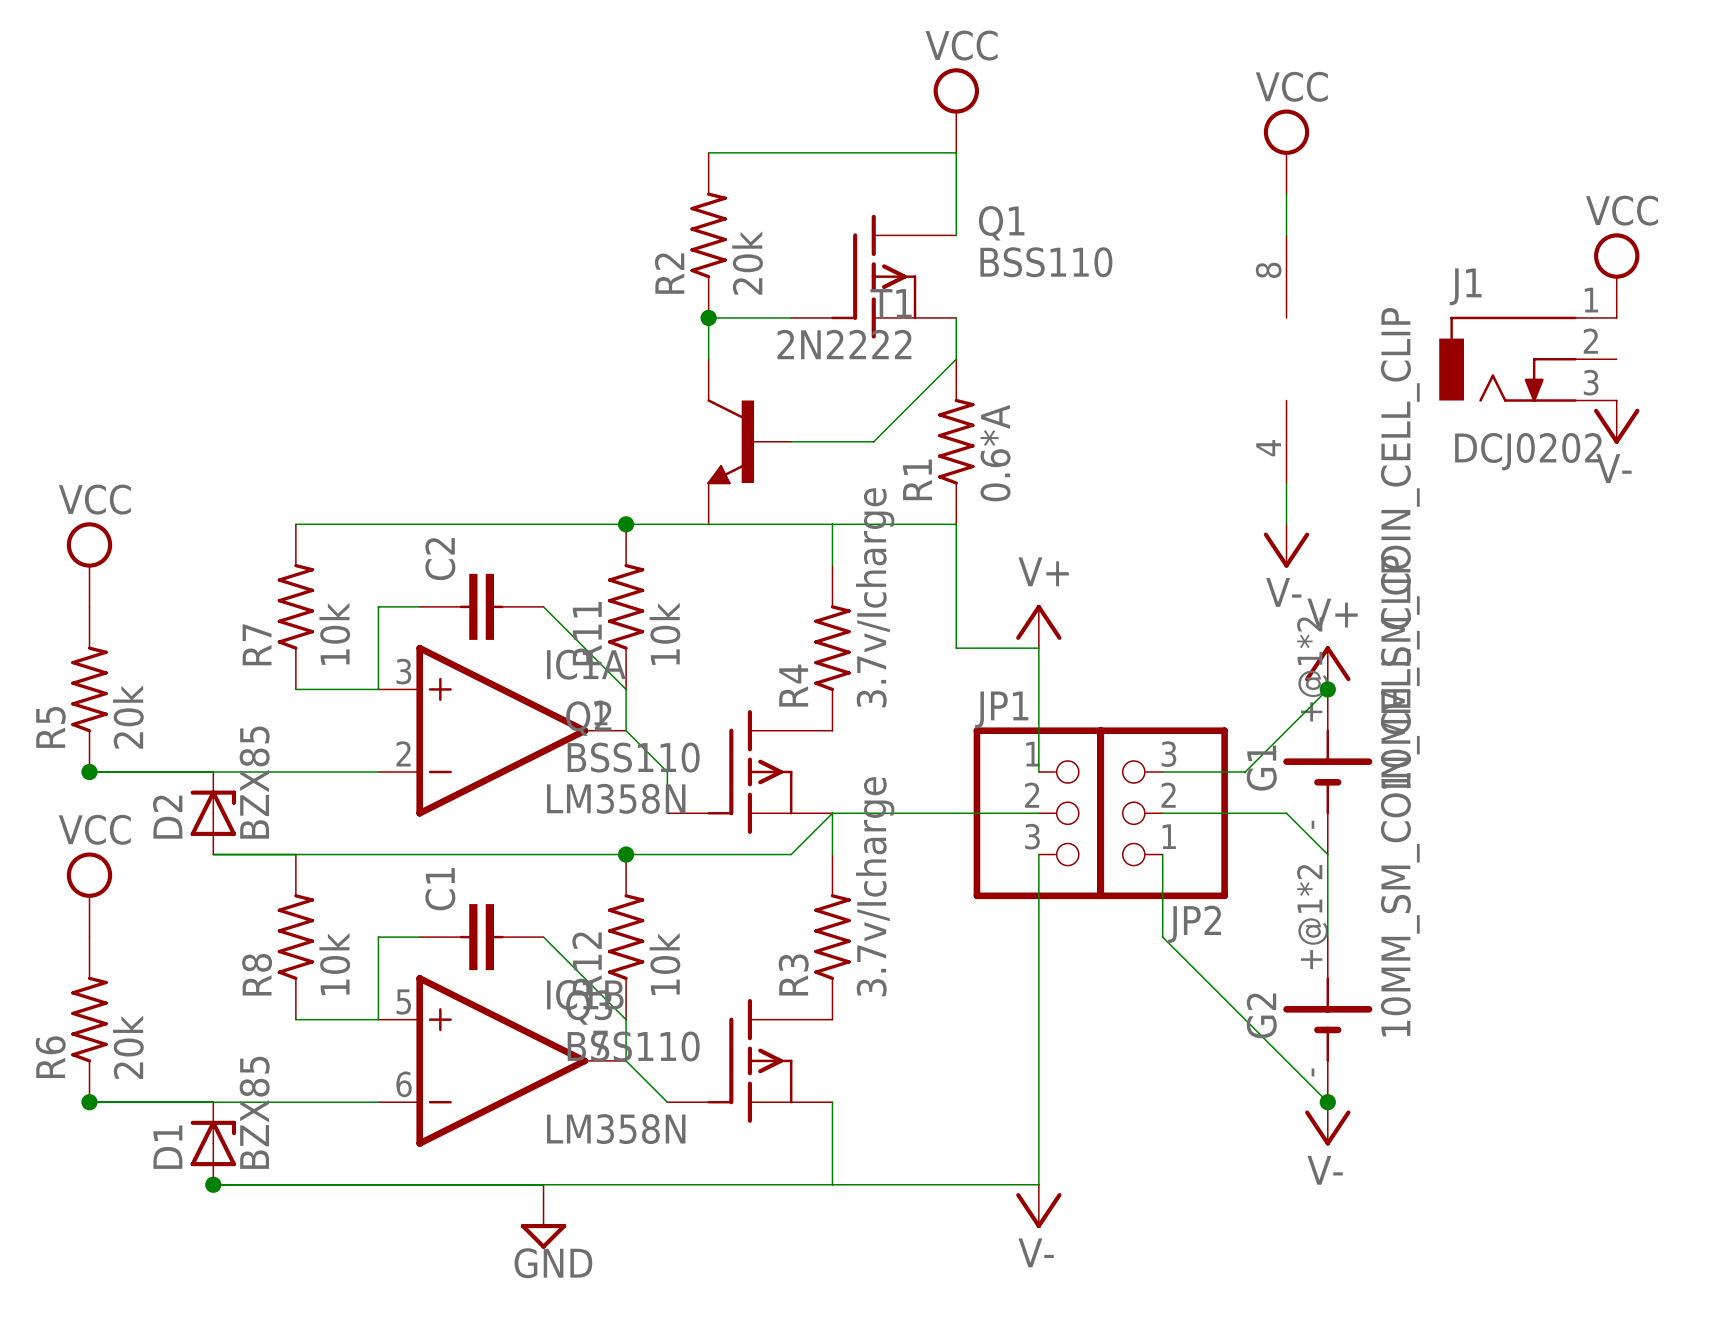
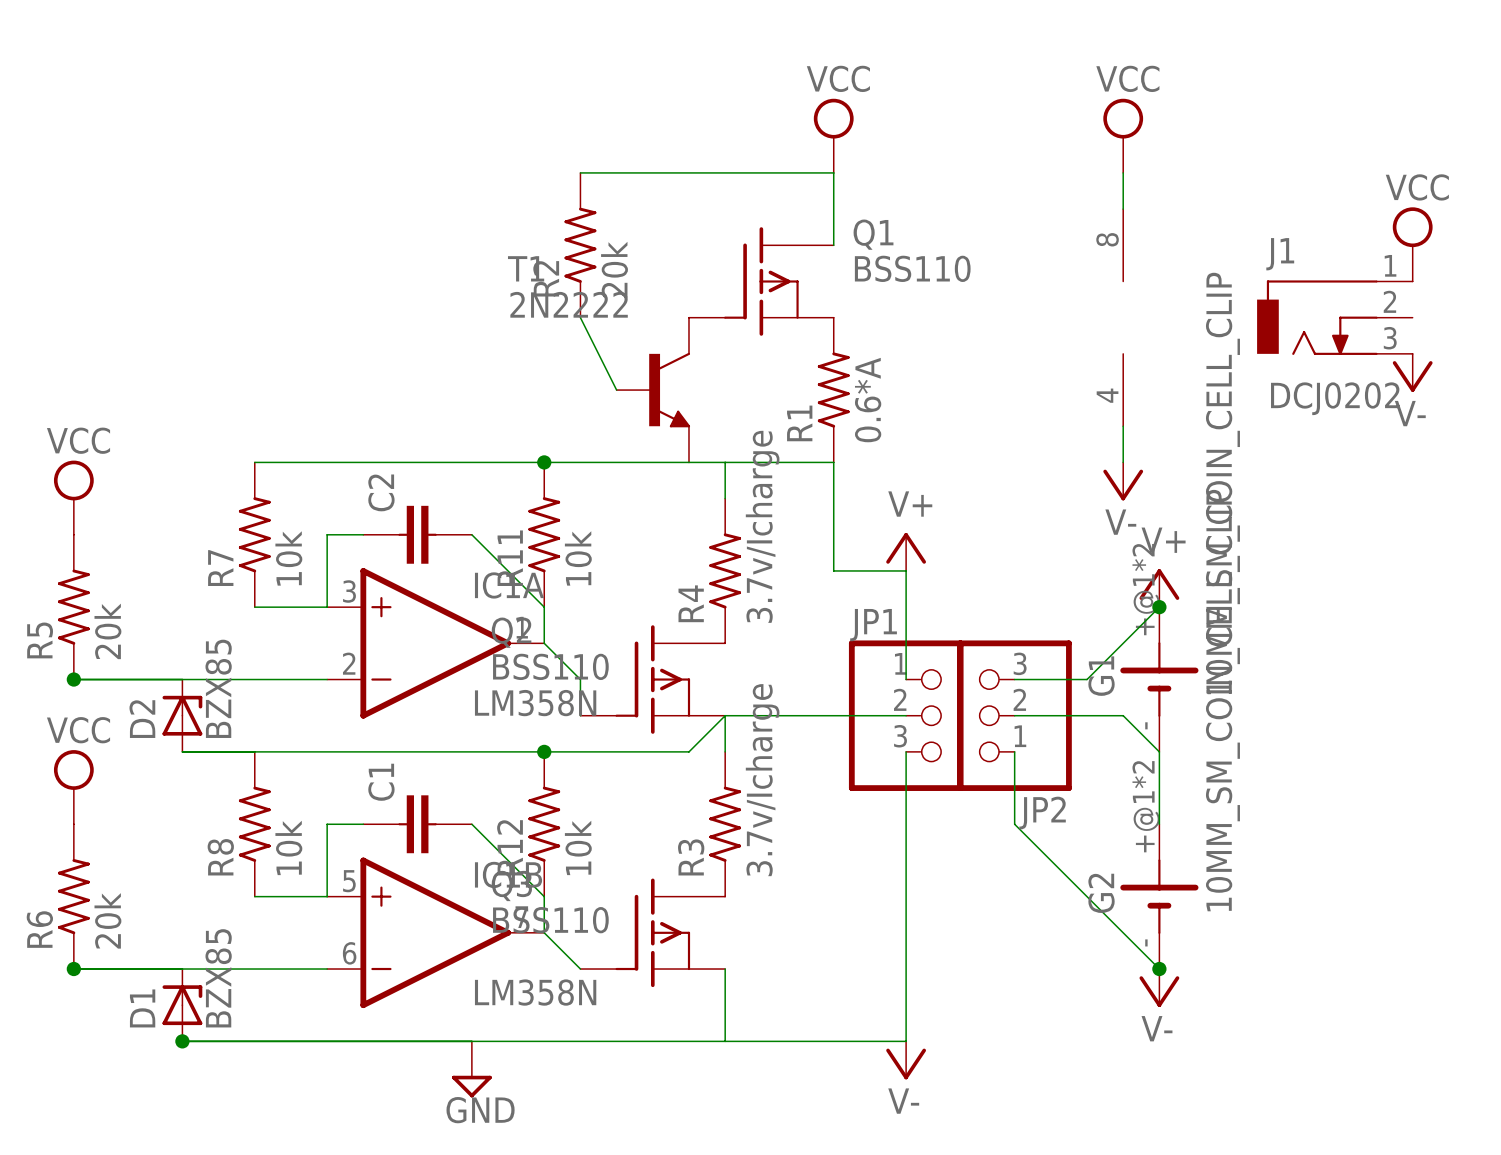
power symbol position: VCC (956, 110) -> VCC (833, 135)
wire: (708, 152) (956, 152) (956, 194) -> (580, 172) (833, 172)
R2 position: (708, 235) -> (580, 245)
wire: none -> (833, 209) (833, 245)
Q1 position: (873, 276) -> (761, 281)
junction: (708, 317) -> none
wire: (791, 317) (708, 317) (708, 359) -> none
wire: (956, 317) (956, 359) (873, 441) (791, 441) -> none
wire: none -> (580, 317) (616, 390)
T1 flip: as is (730, 441) -> left-right (669, 390)

